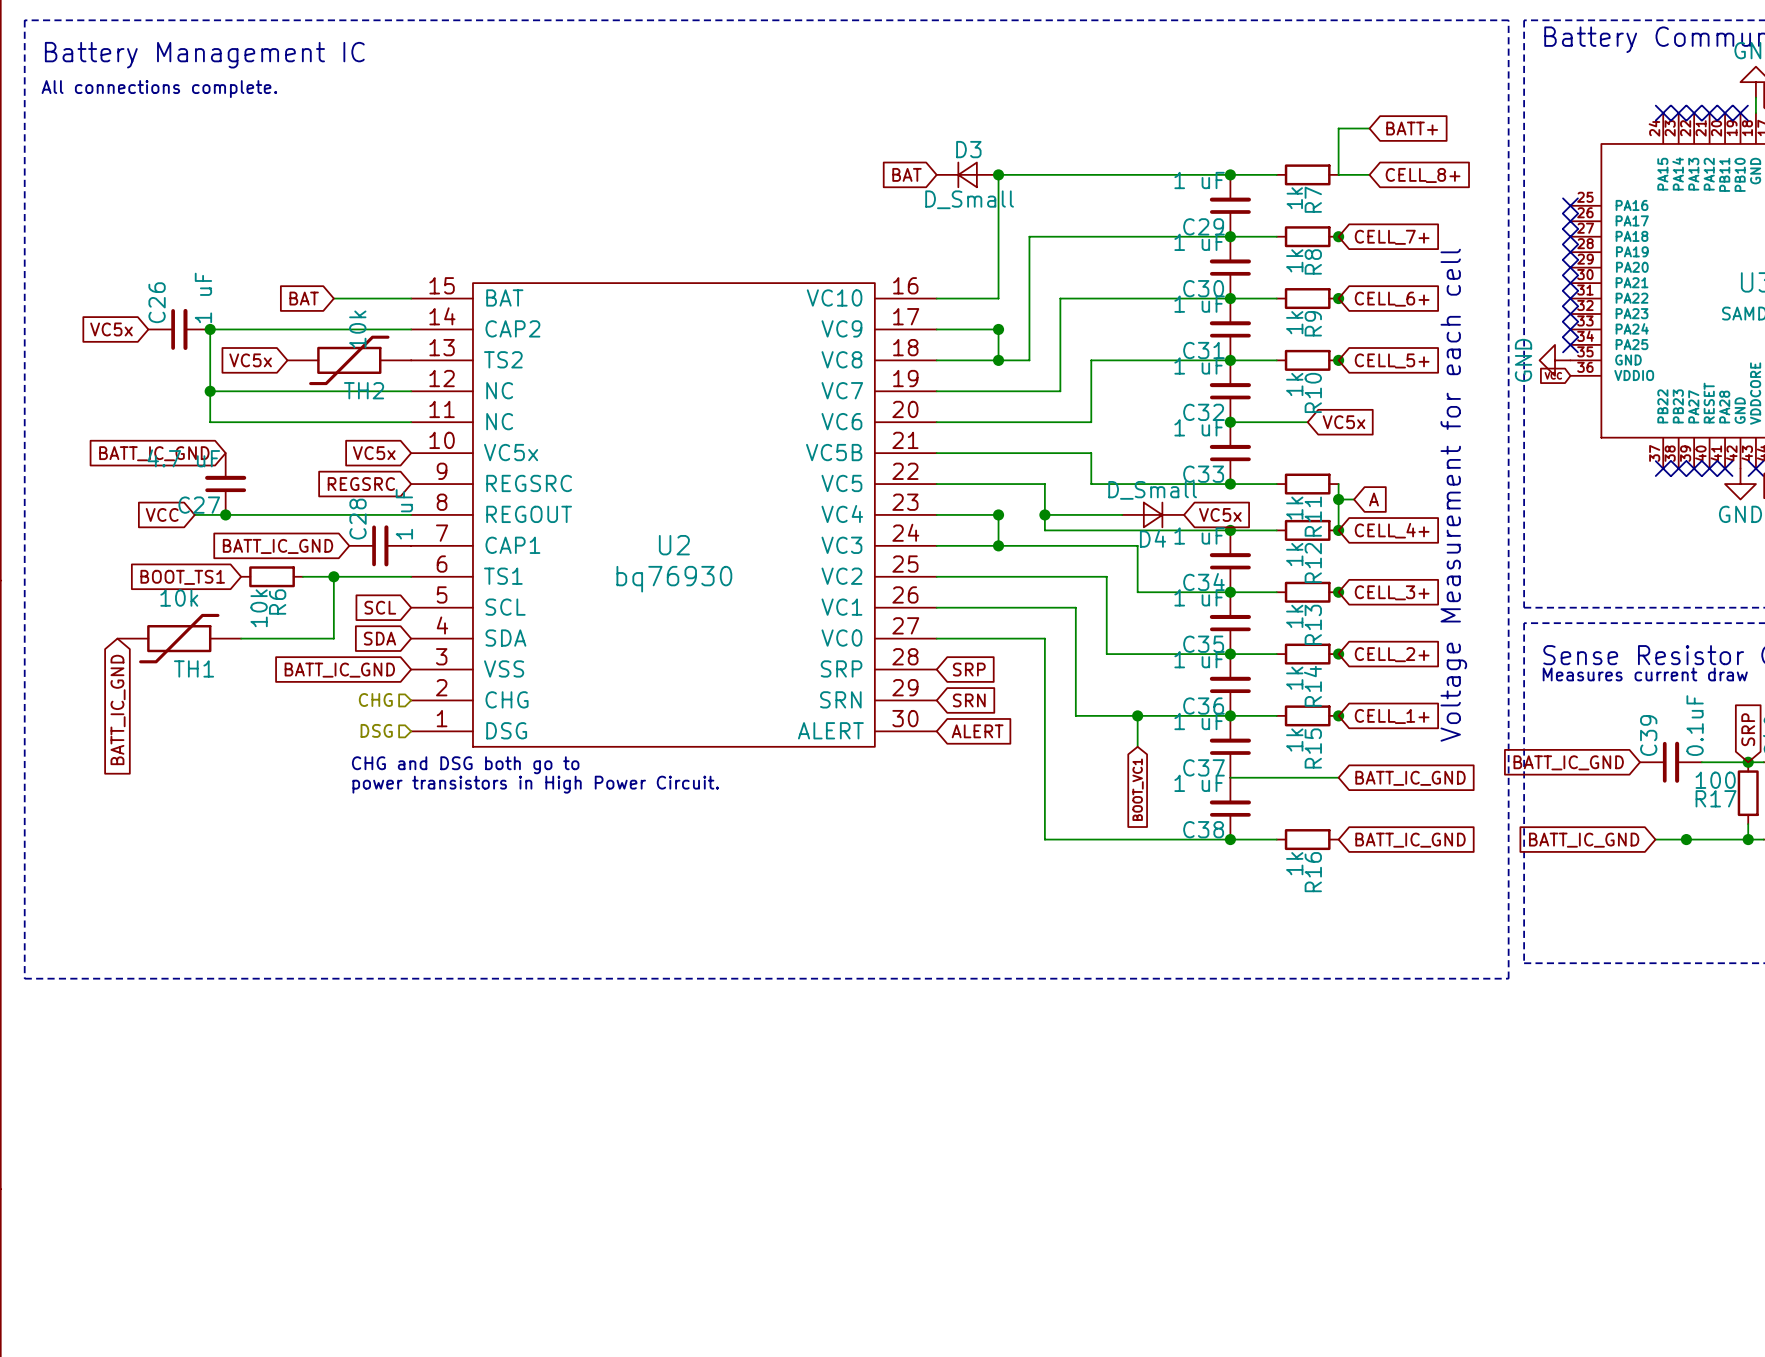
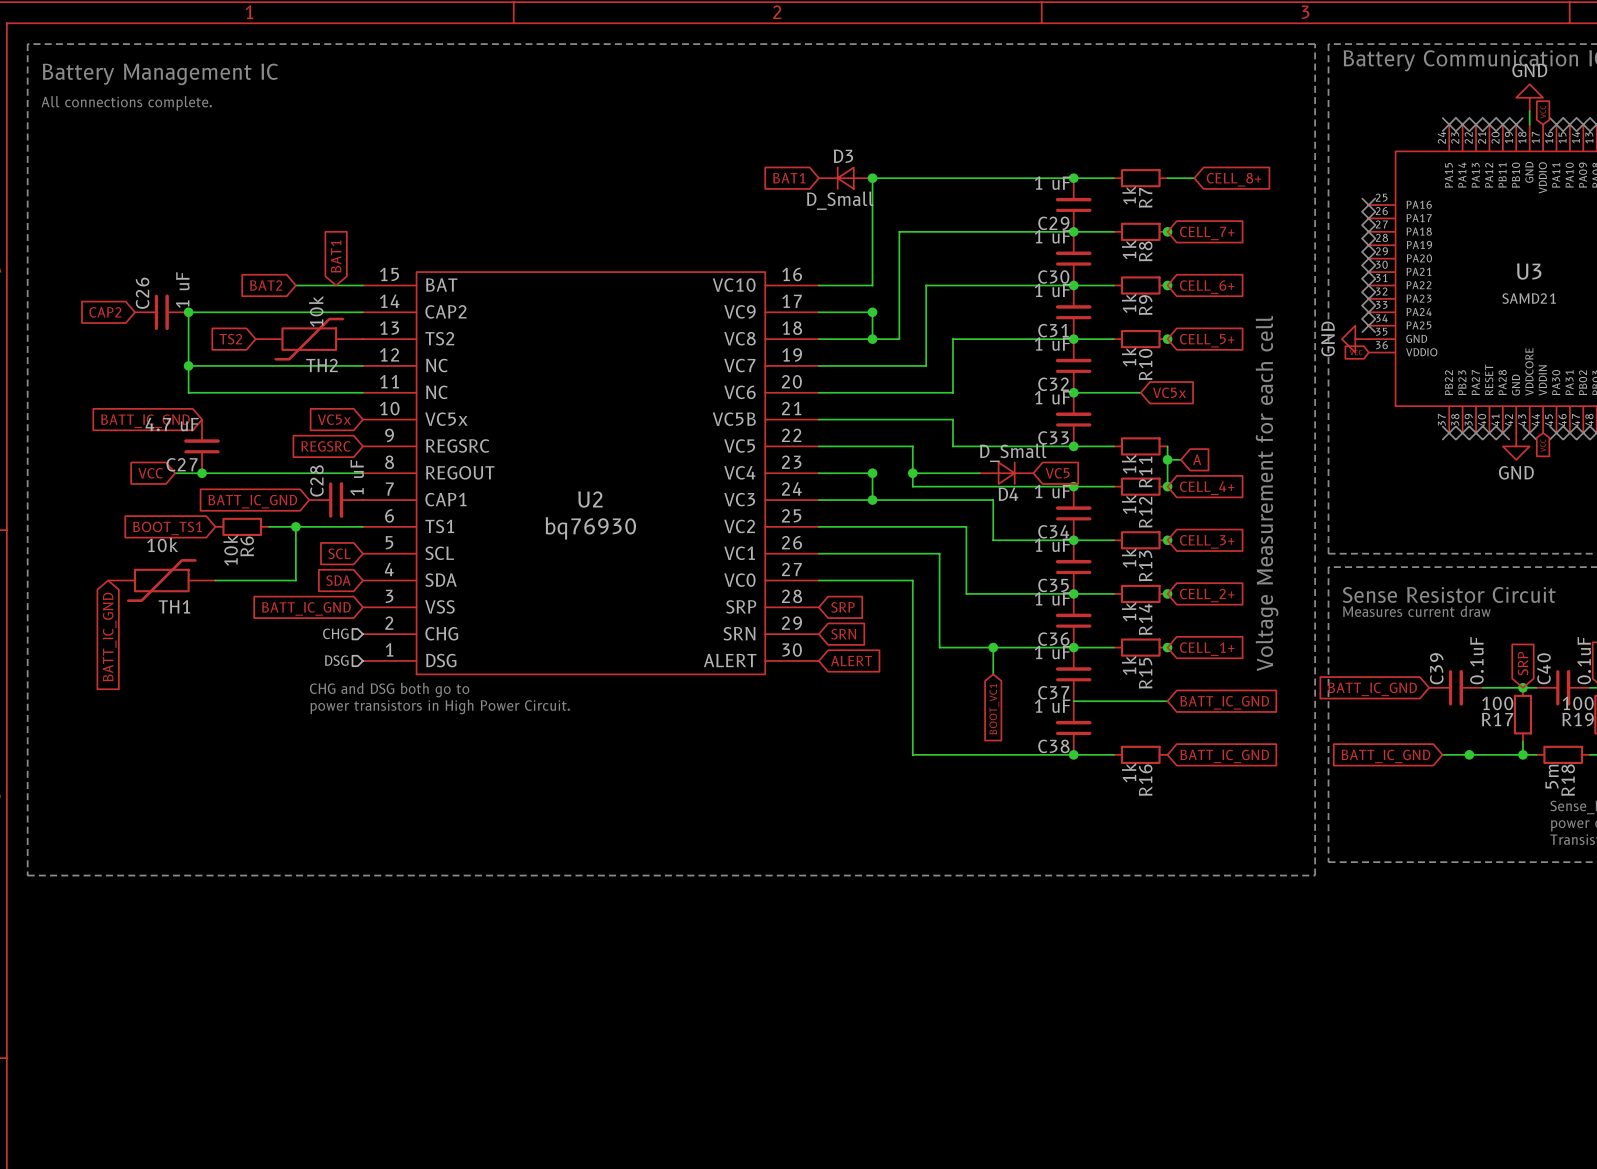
wire: (1369, 128) (1338, 128) (1338, 174) -> none
global label: BATT+ (1412, 128) -> none
global label: BAT (906, 174) -> BAT1 (789, 178)
global label: none -> BAT1 (336, 256)
global label: BAT (304, 298) -> BAT2 (266, 285)
global label: VC5x (111, 329) -> CAP2 (105, 312)
global label: VC5x (250, 360) -> TS2 (230, 339)
global label: VC5x (1220, 514) -> VC5 (1057, 473)

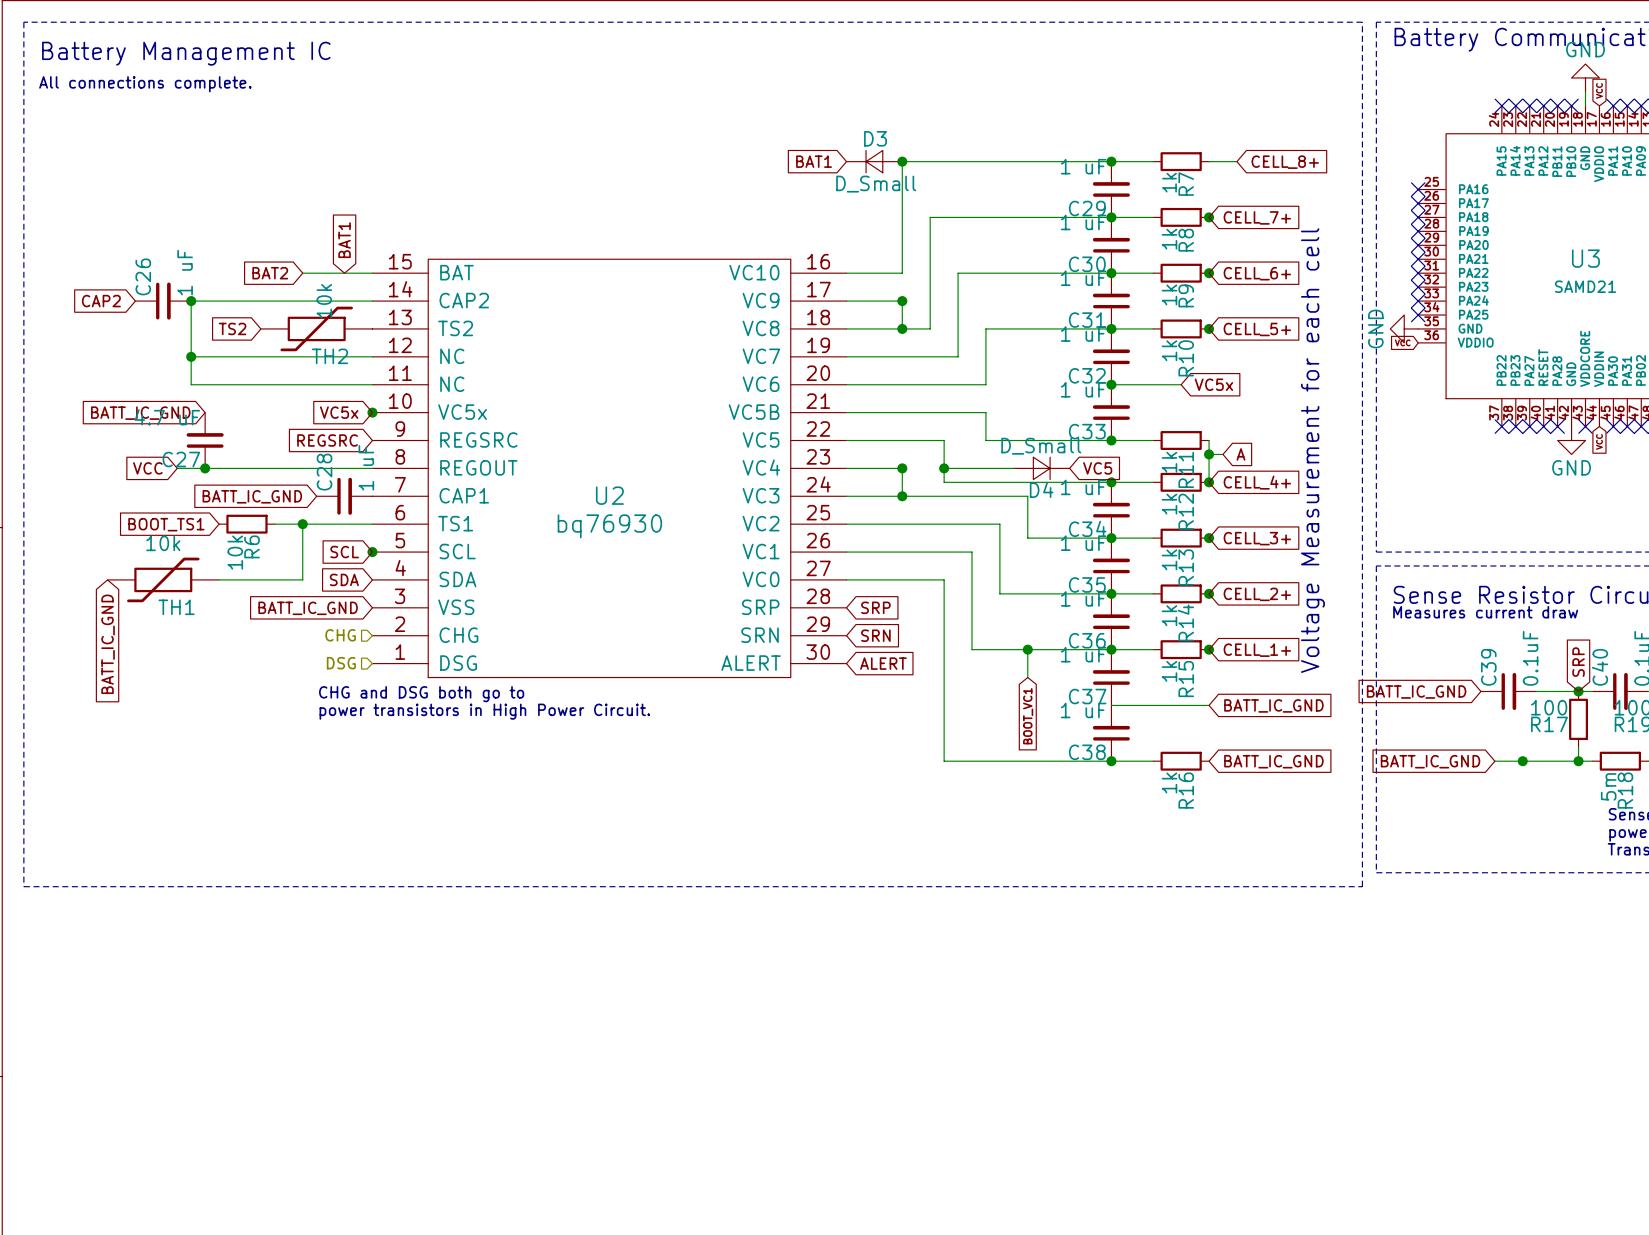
junction: none -> (372, 412)
junction: none -> (372, 552)

